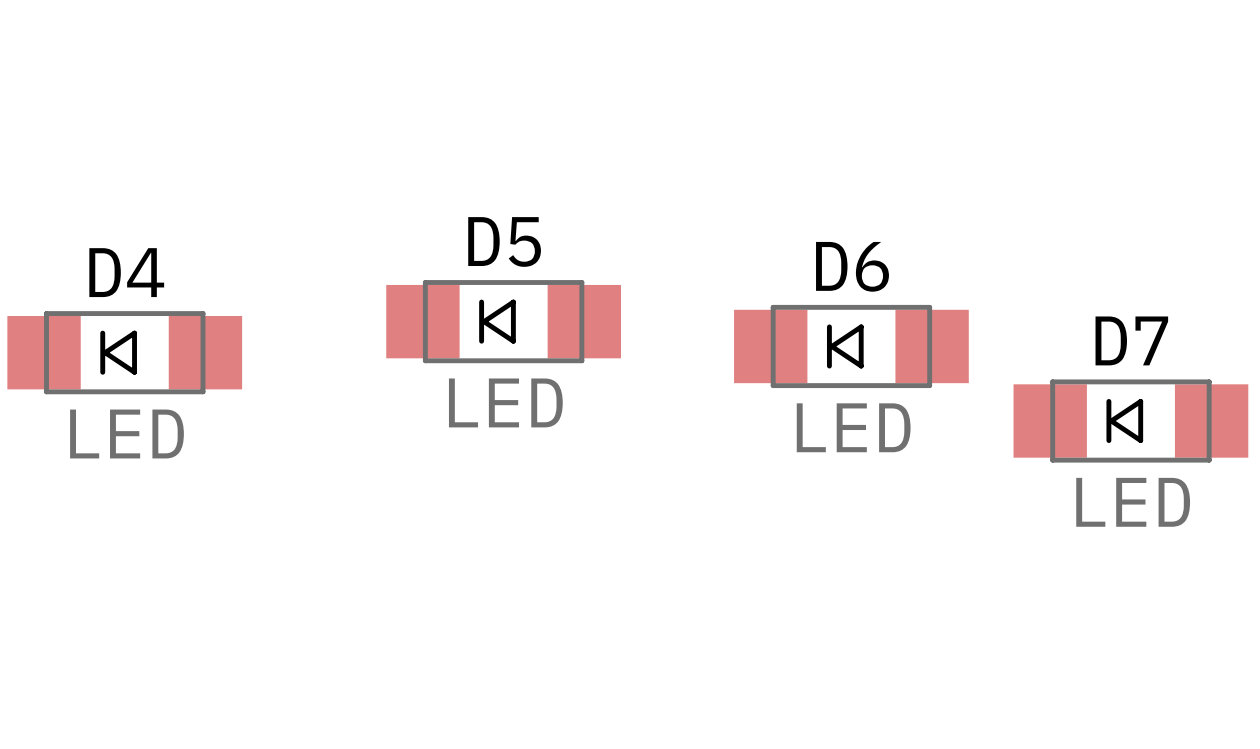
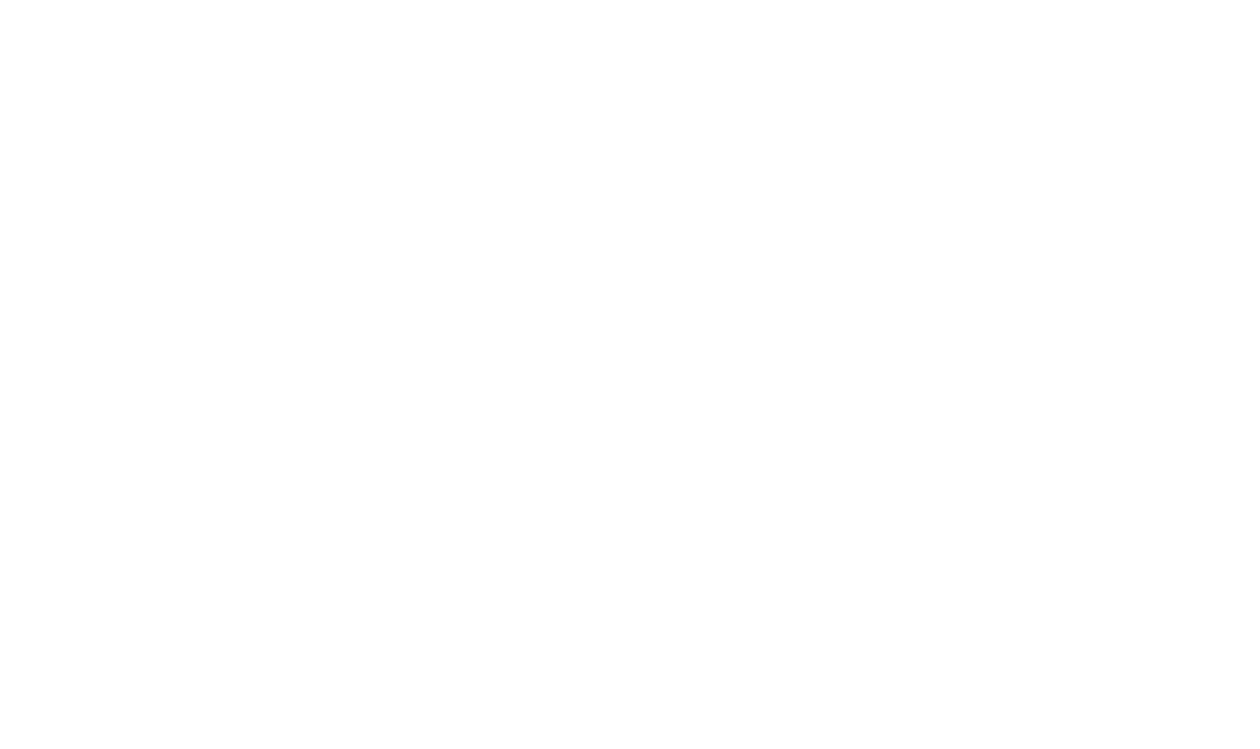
D5: LED (503, 321) -> none
D6: LED (851, 346) -> none
D4: LED (124, 352) -> none
D7: LED (1130, 421) -> none

